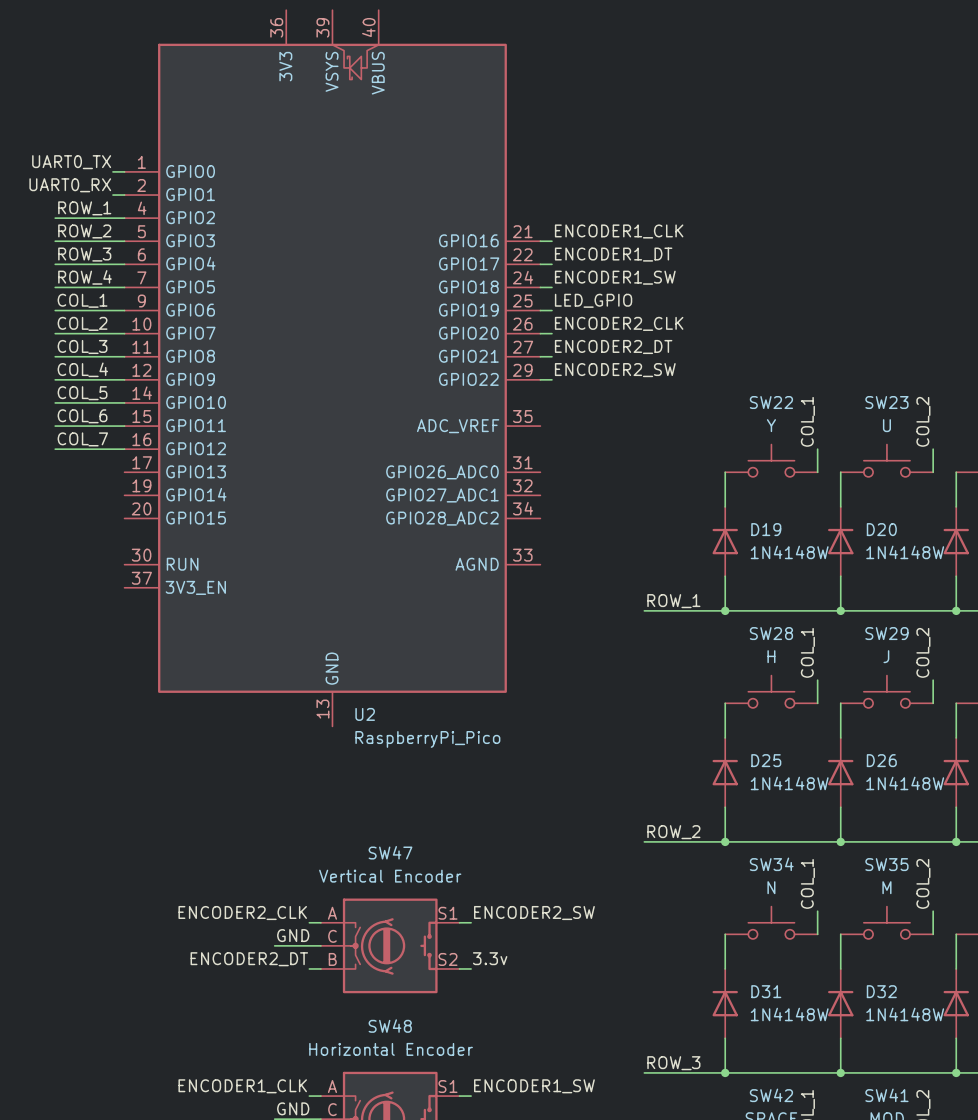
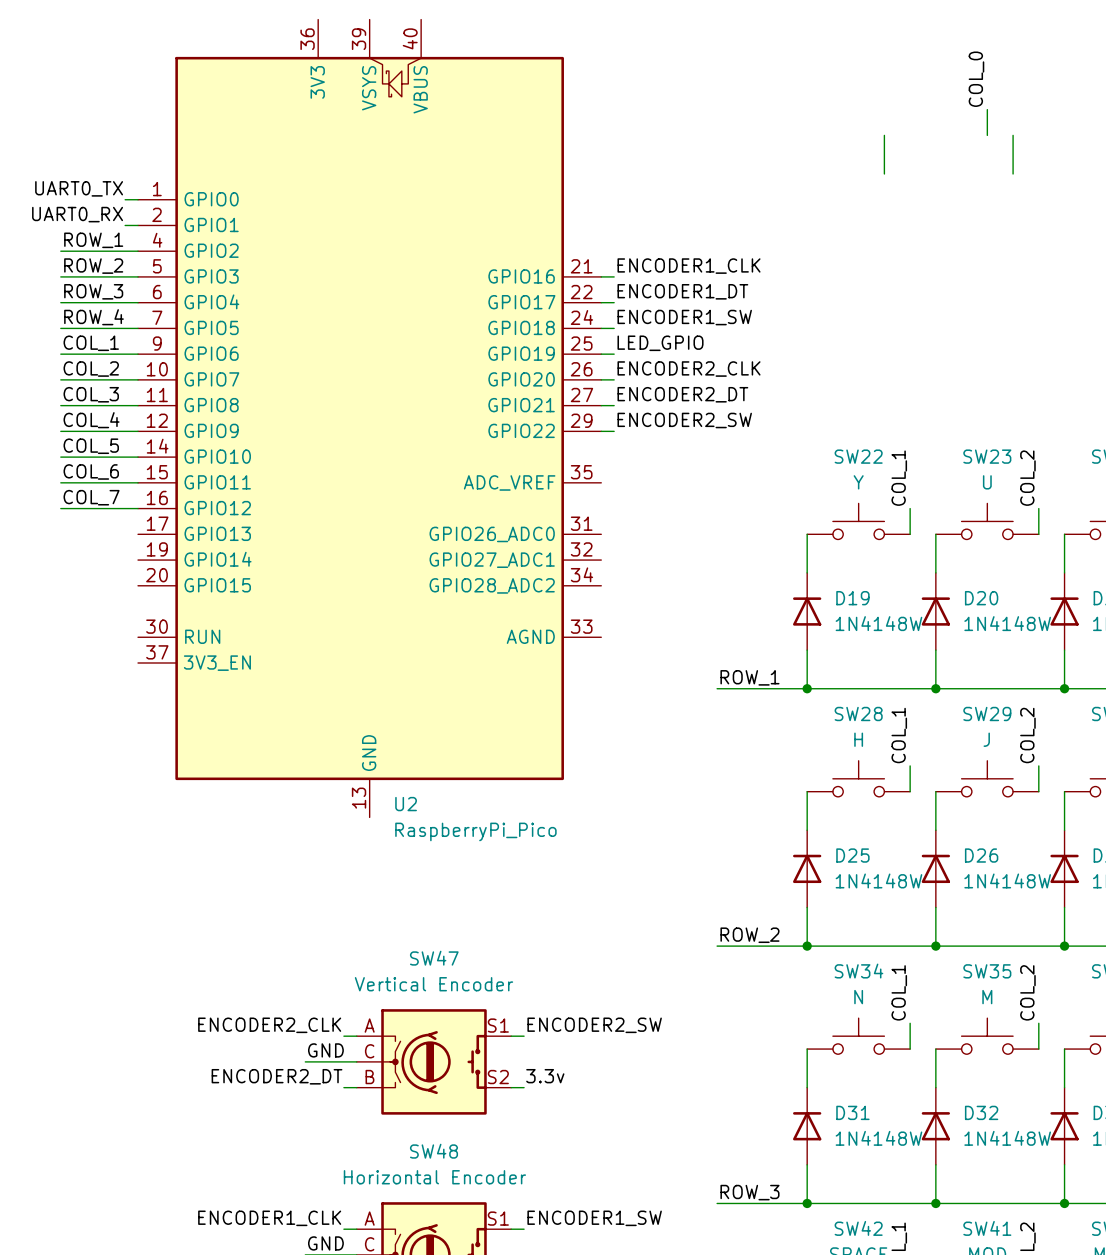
label: none -> COL_0 (976, 79)
wire: none -> (987, 109) (987, 135)
wire: none -> (884, 135) (884, 173)
wire: none -> (1013, 135) (1013, 173)

